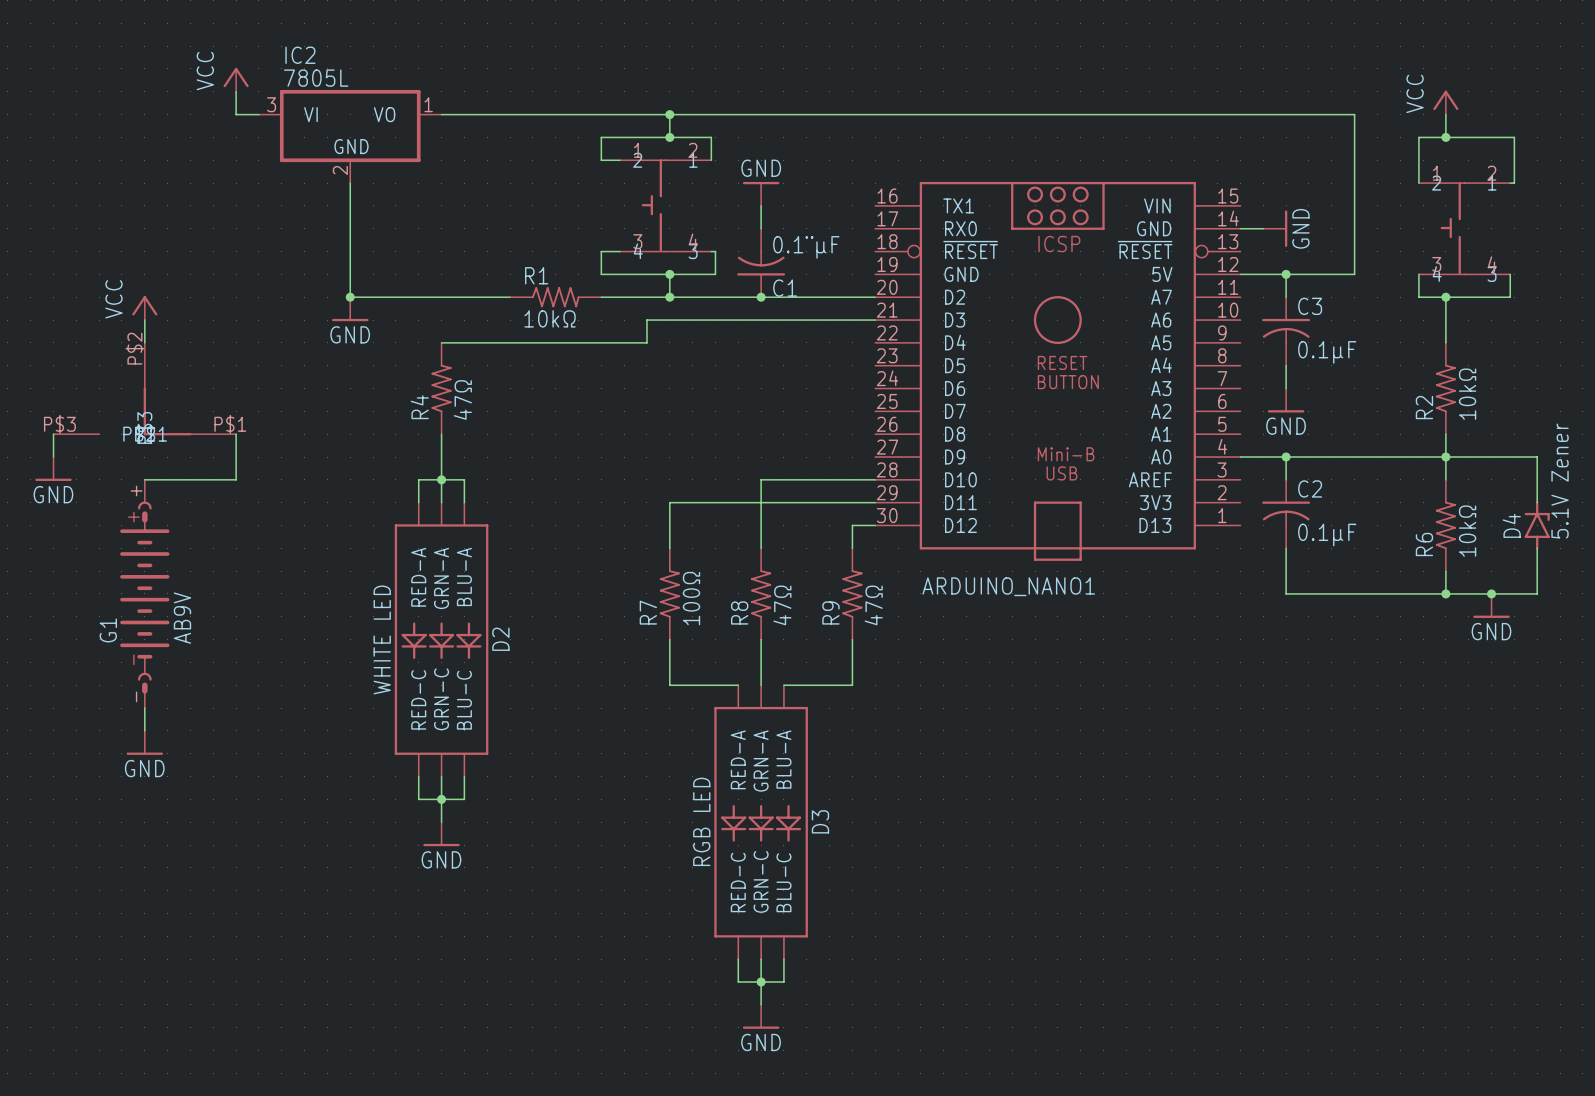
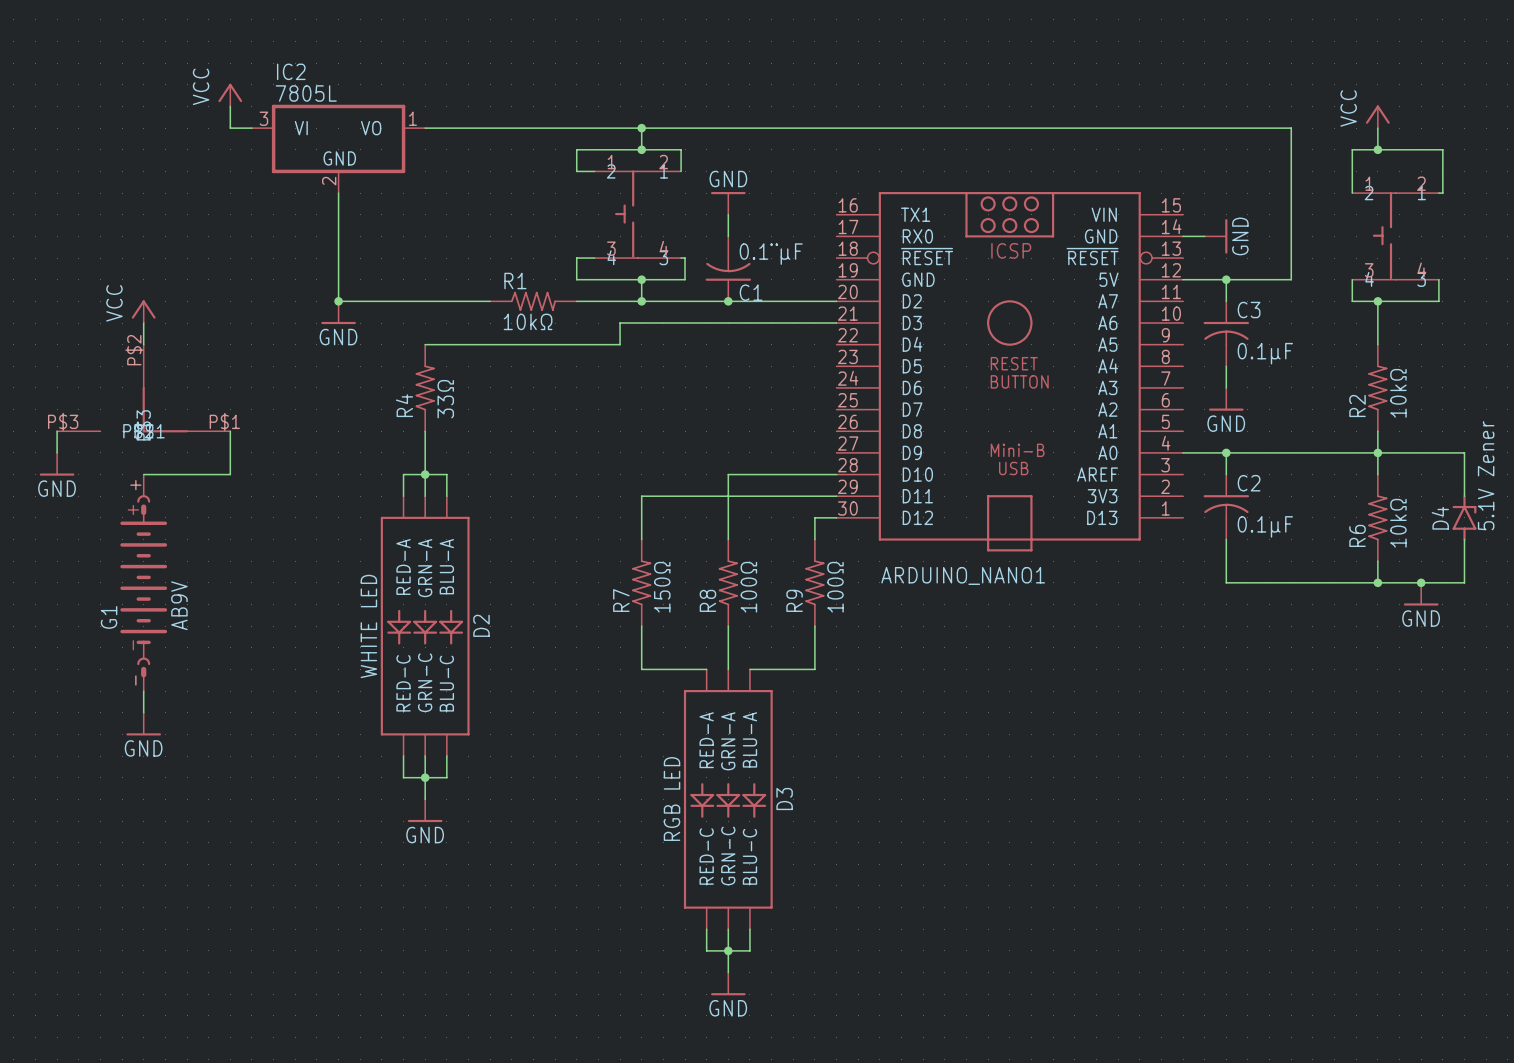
R4 value: 47Ω (462, 400) -> 33Ω (445, 399)
R7 value: 100Ω (691, 598) -> 150Ω (662, 587)
R8 value: 47Ω (782, 605) -> 100Ω (748, 587)
R9 value: 47Ω (873, 605) -> 100Ω (835, 587)

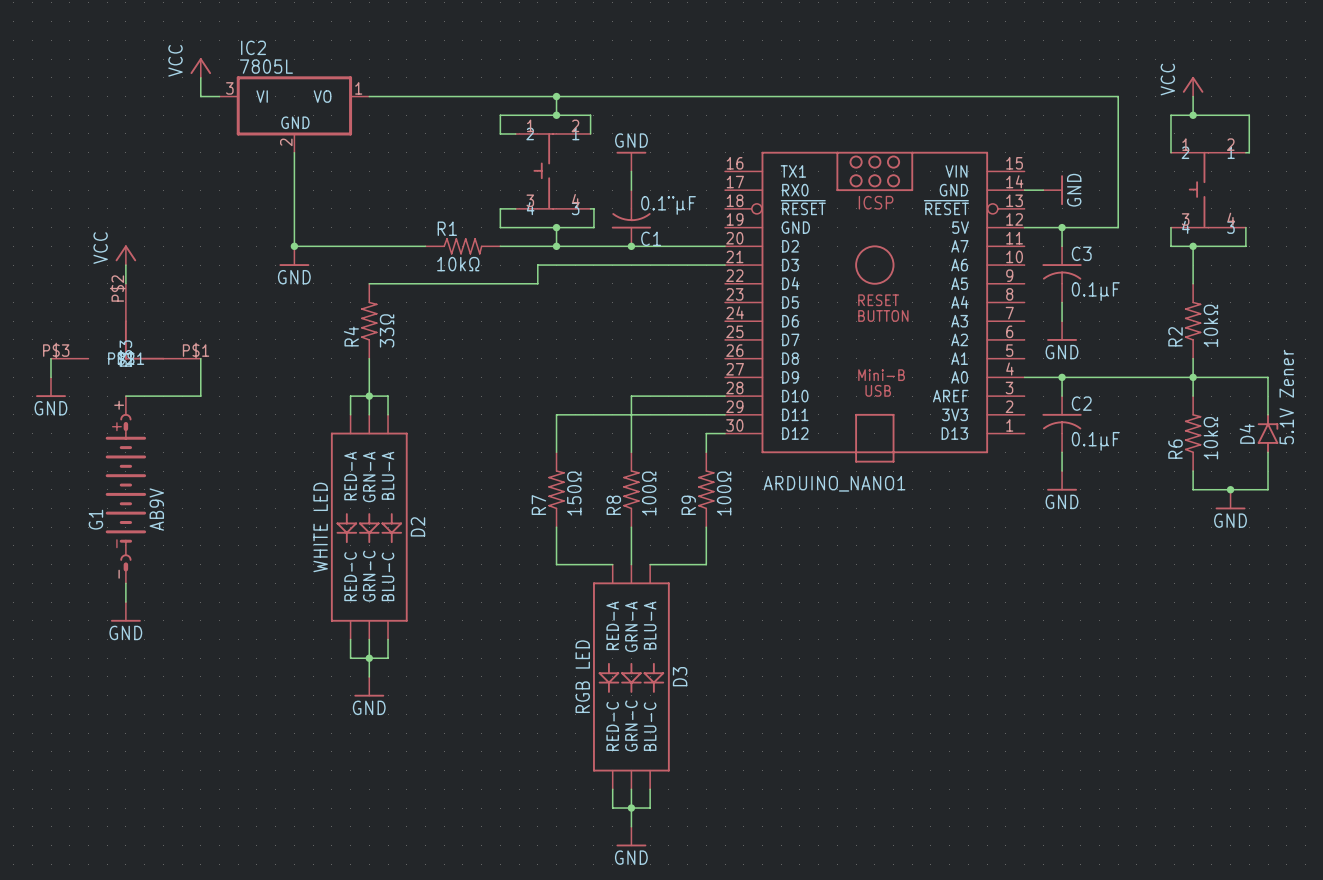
wire: (1226, 561) (1226, 582) (1377, 582) -> none
power symbol: none -> GND (1062, 480)
junction: (1377, 582) -> none

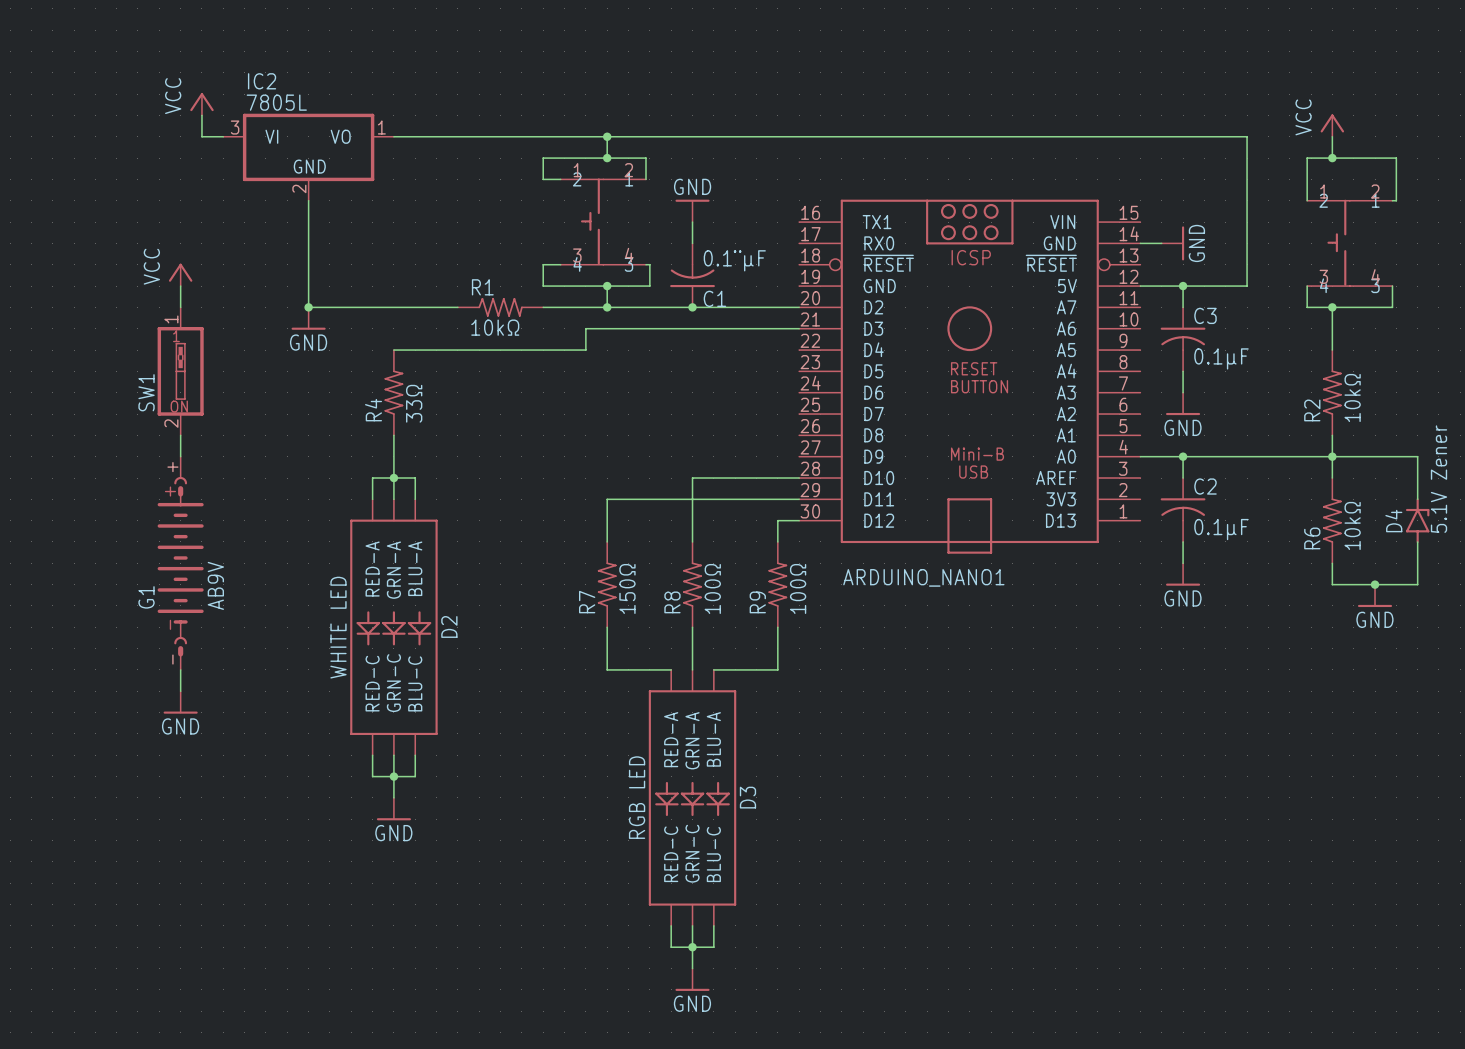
power symbol position: VCC (125, 255) -> VCC (180, 274)
wire: (125, 265) (125, 283) -> (180, 286) (180, 307)
SW1: none -> (180, 371)
part: (125, 321) -> none
wire: (51, 358) (51, 377) -> (180, 435) (180, 456)
wire: (200, 358) (200, 396) (125, 396) -> none
power symbol: GND (51, 387) -> none
G1 position: (125, 489) -> (180, 563)
wire: (125, 583) (125, 602) -> (180, 669) (180, 691)
power symbol position: GND (125, 611) -> GND (180, 702)

